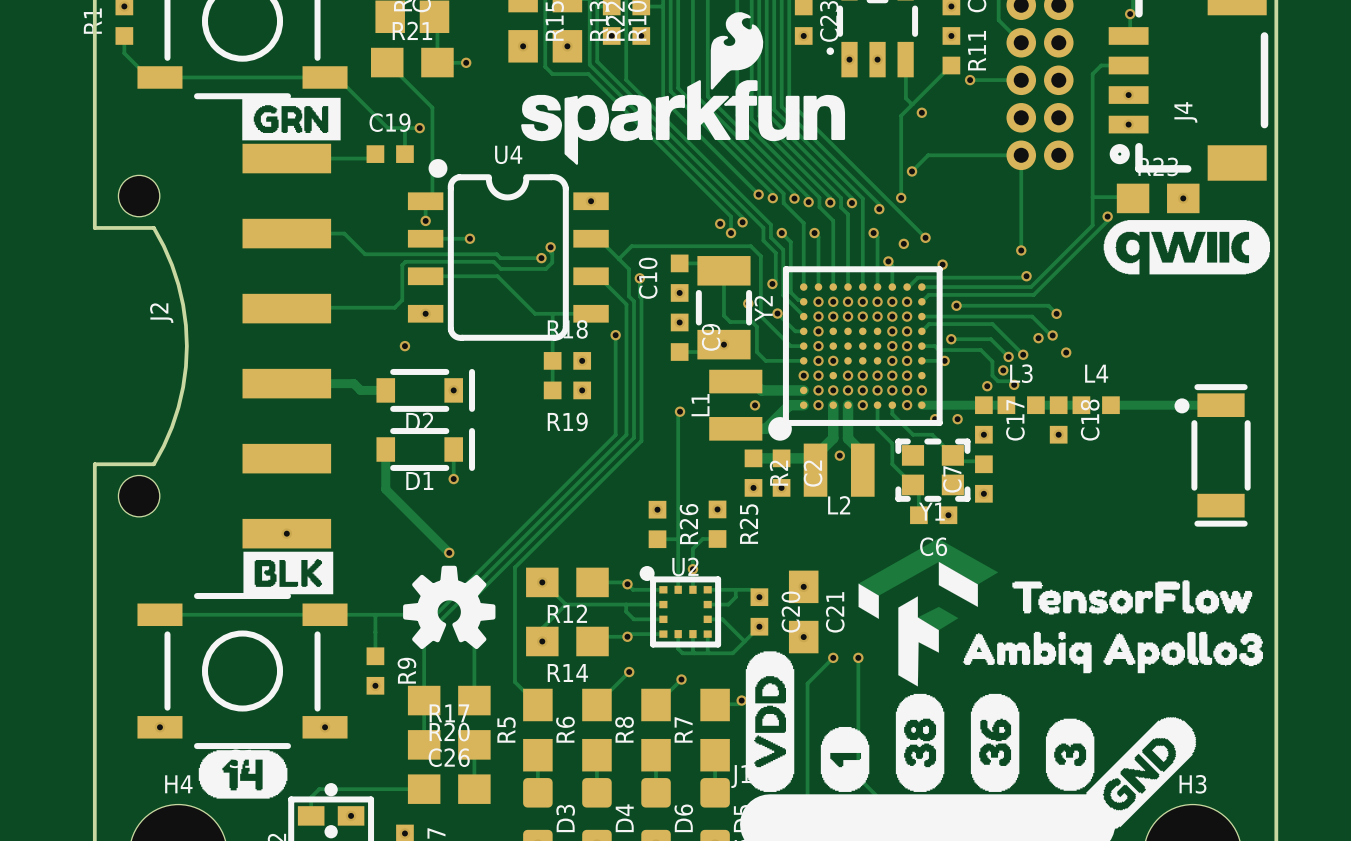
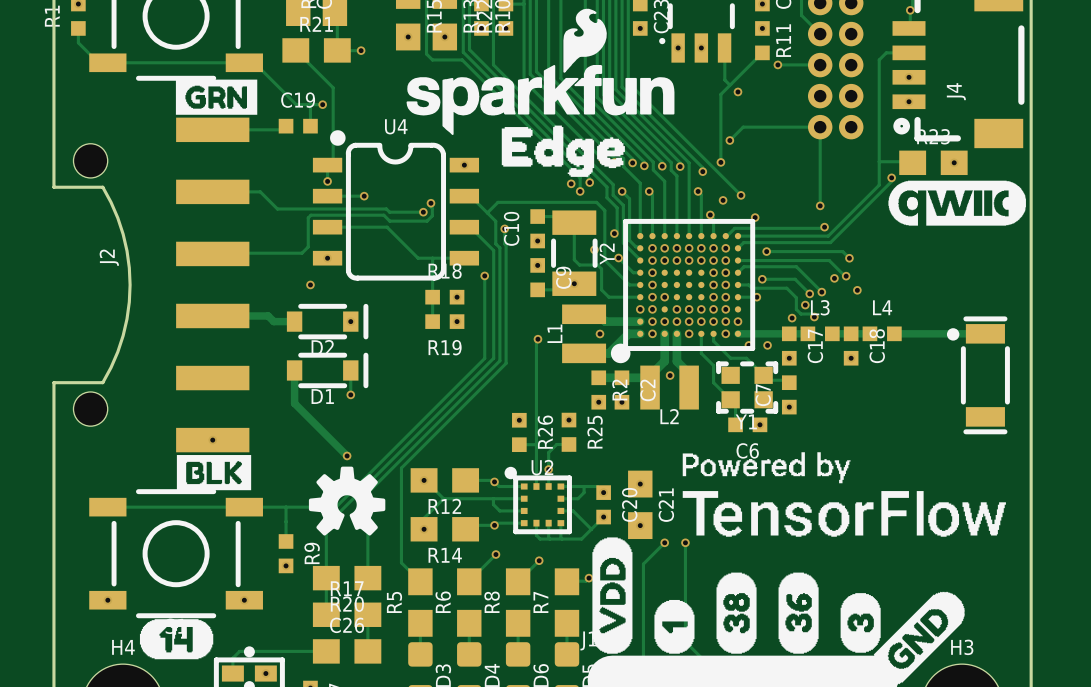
drawing: none -> [501, 125, 625, 177]
drawing: [858, 538, 1263, 687] -> none
drawing: none -> [682, 452, 1006, 537]

